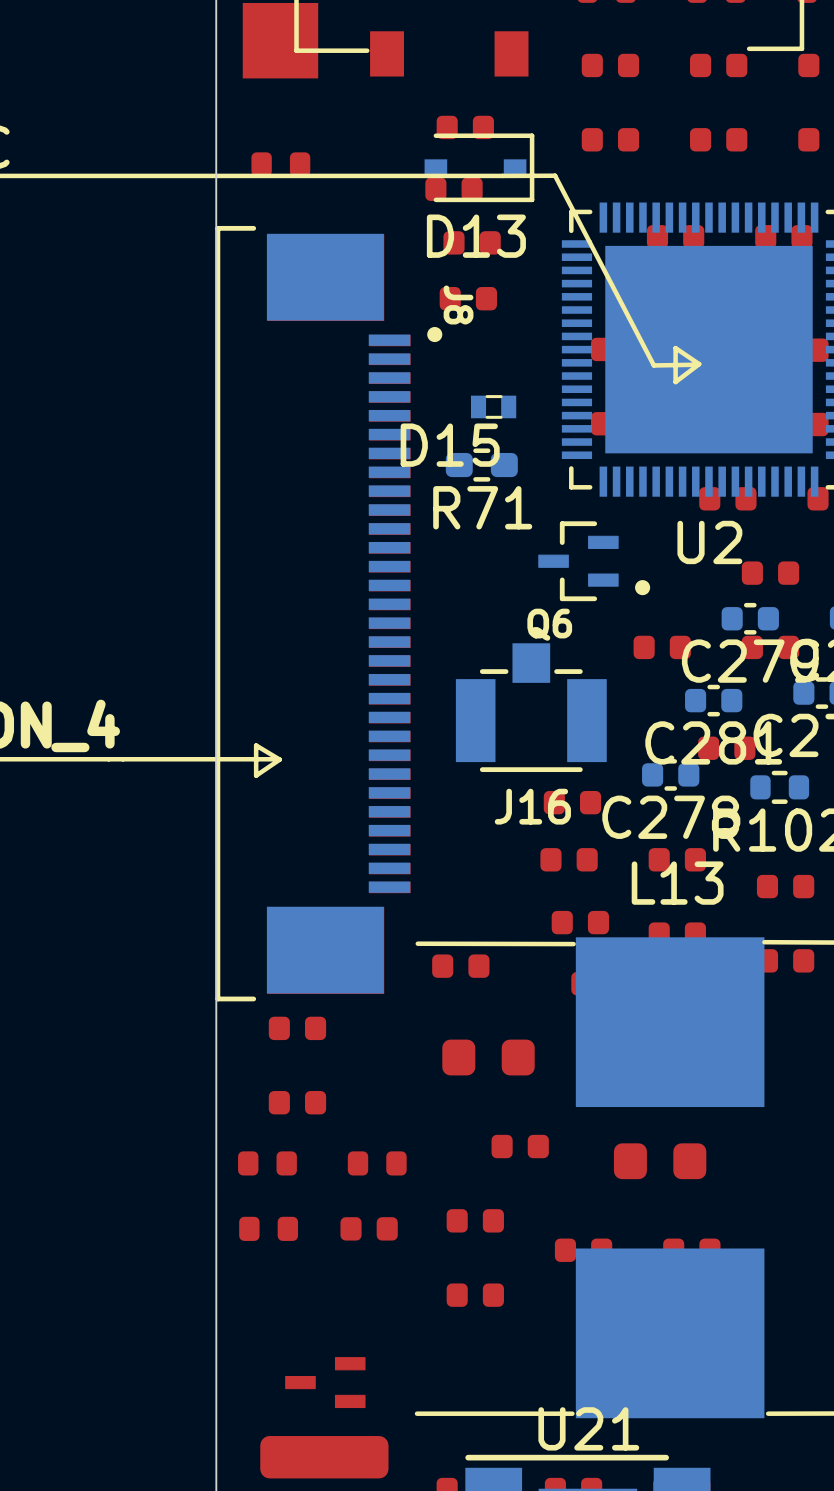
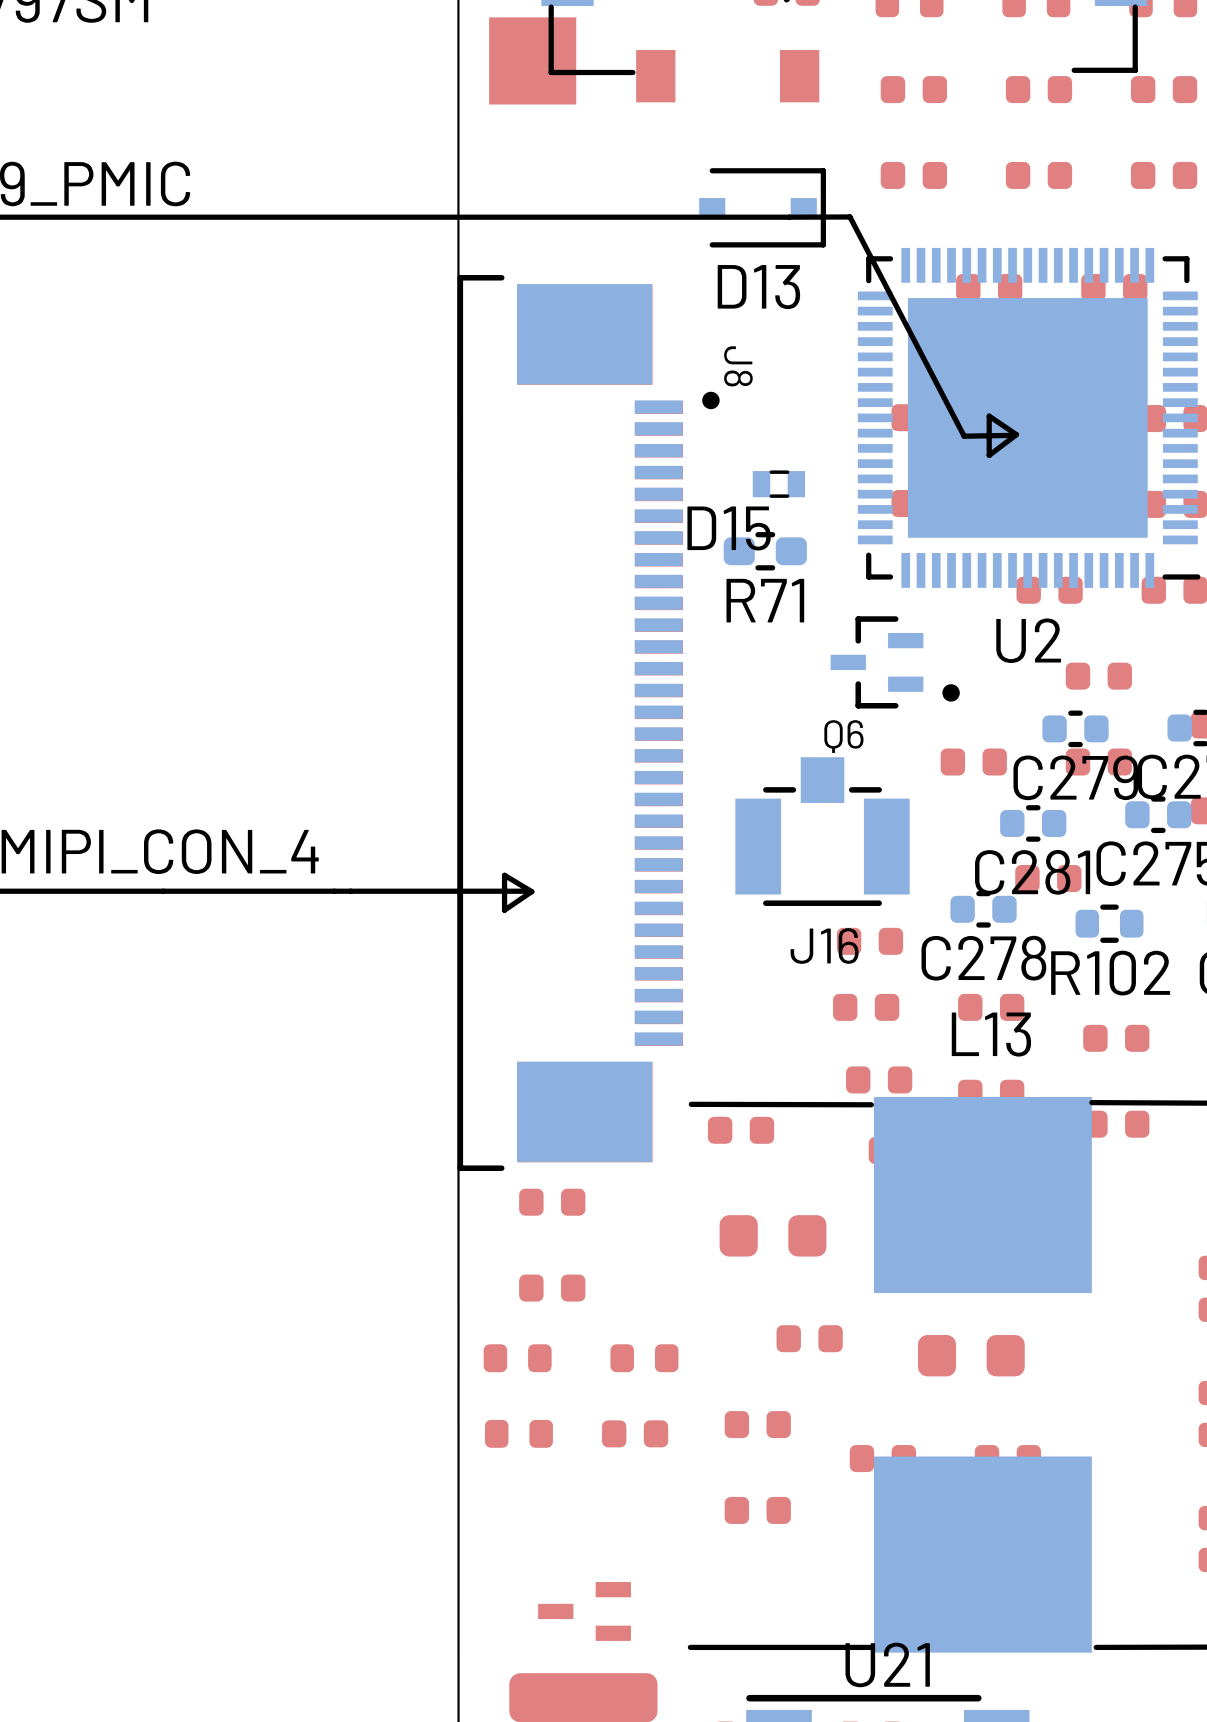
part: (465, 127) -> none
part: (280, 164) -> none
part: (453, 189) -> none
part: (472, 242) -> none
part: (468, 298) -> none

